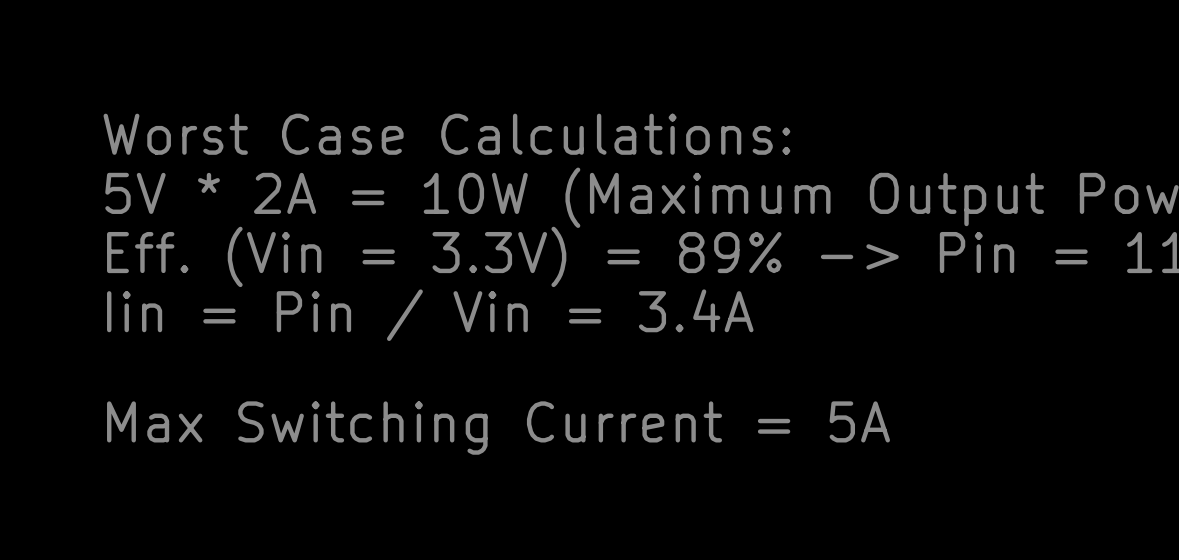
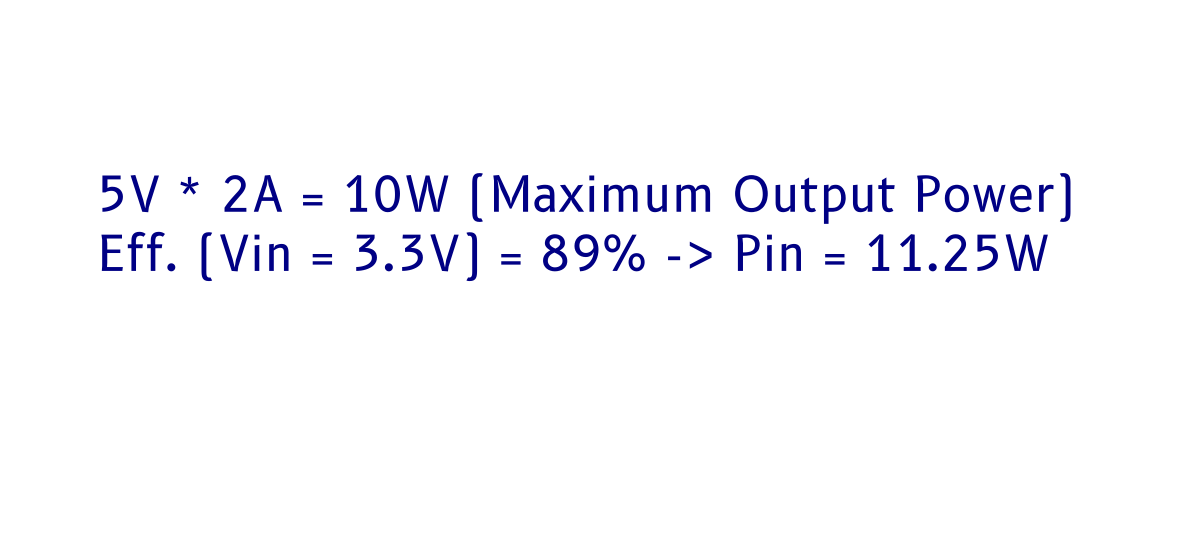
text: Worst Case Calculations: (446, 134) -> none
text: Iin = Pin / Vin = 3.4A (430, 315) -> none
text: Max Switching Current = 5A (498, 428) -> none

